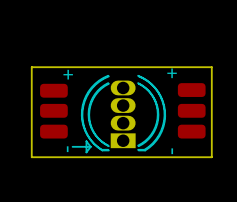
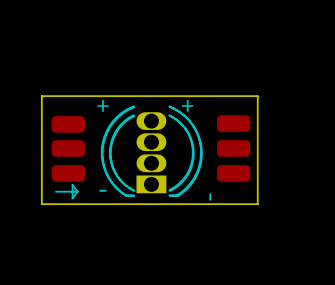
text position: + (172, 73) -> + (187, 105)
text position: + (68, 74) -> + (102, 105)
line: (72, 146) (90, 146) -> (55, 191) (77, 191)
line: (90, 146) (86, 141) (86, 152) (90, 146) -> (77, 191) (72, 185) (72, 198) (77, 191)
text rotation: 0° (67, 149) -> 90° clockwise (102, 190)

